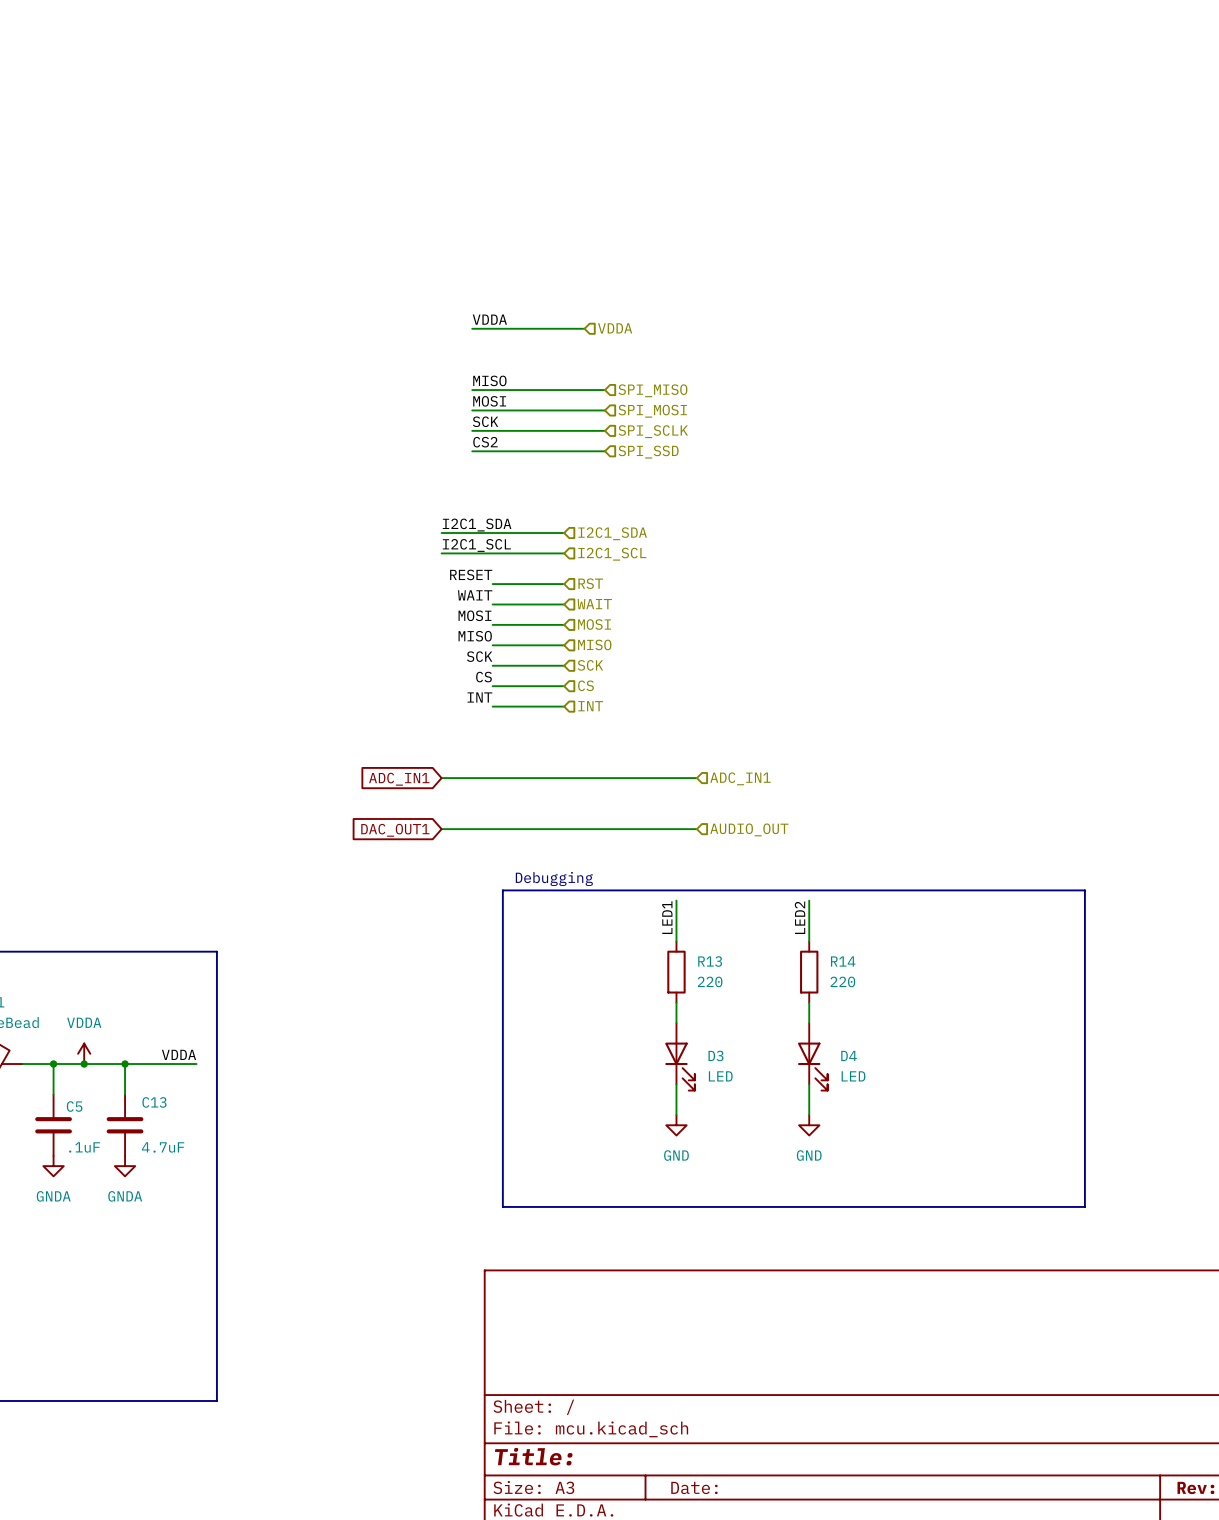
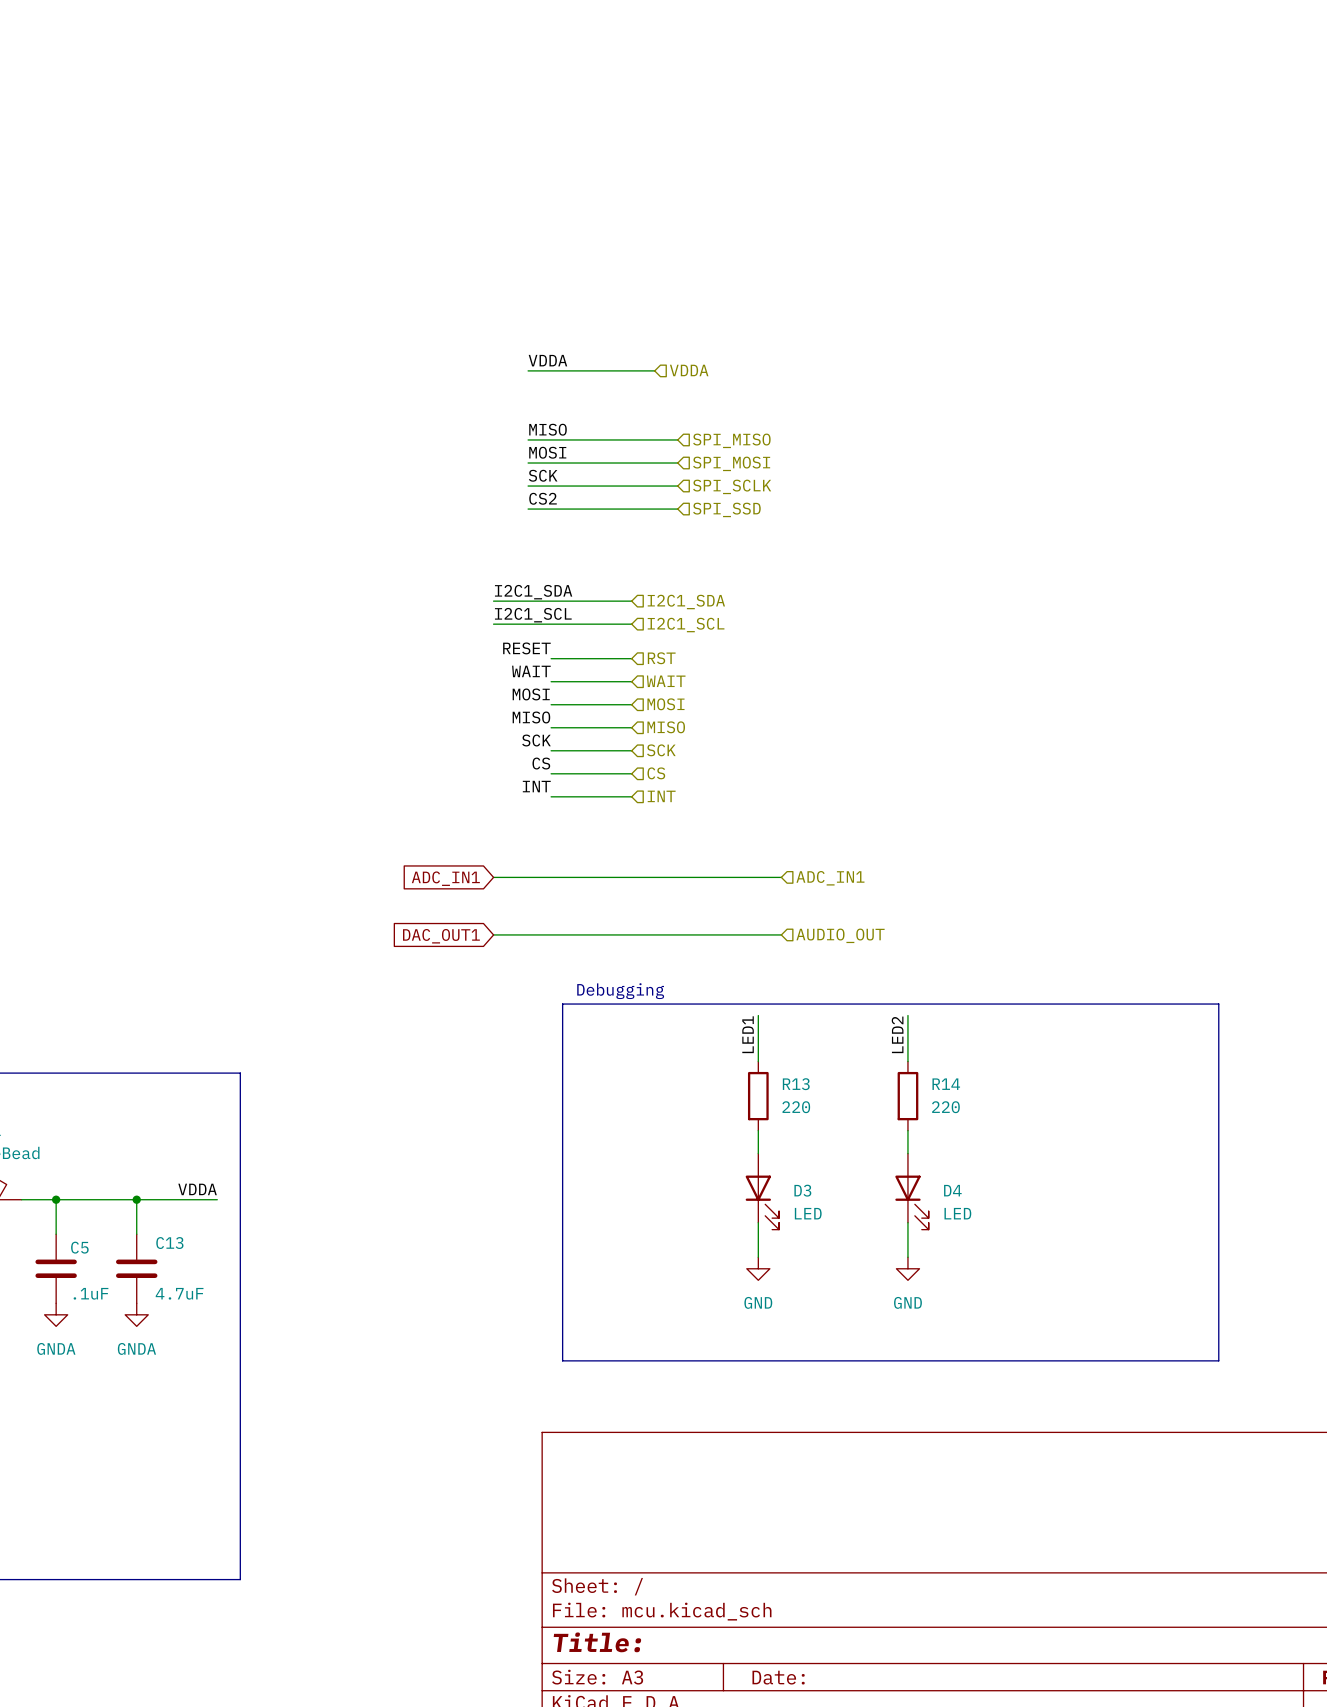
power symbol: VDDA (84, 1053) -> none
junction: (84, 1064) -> none

